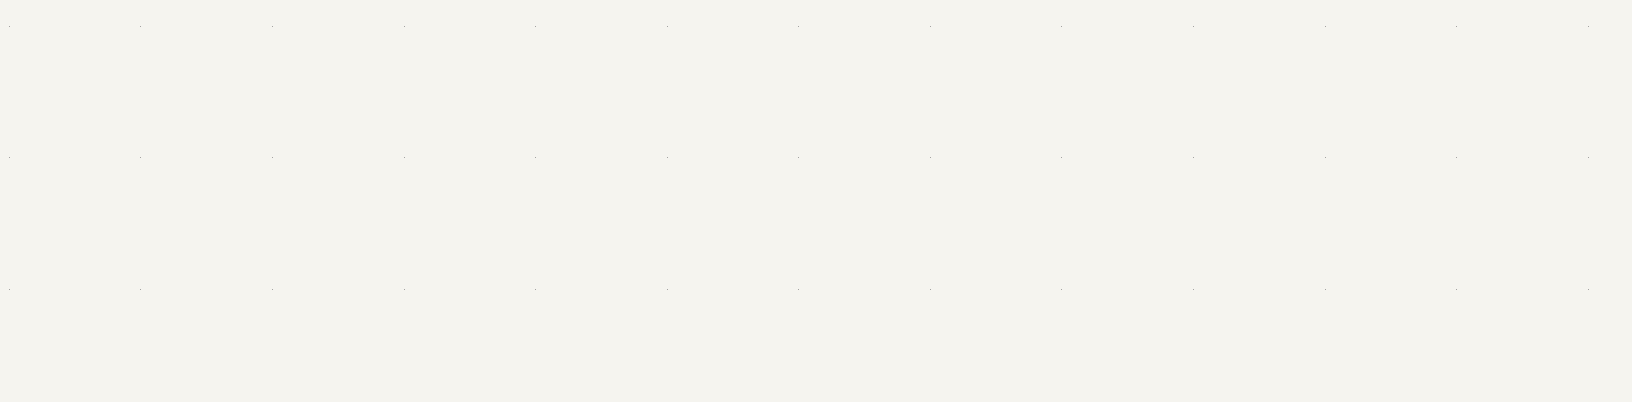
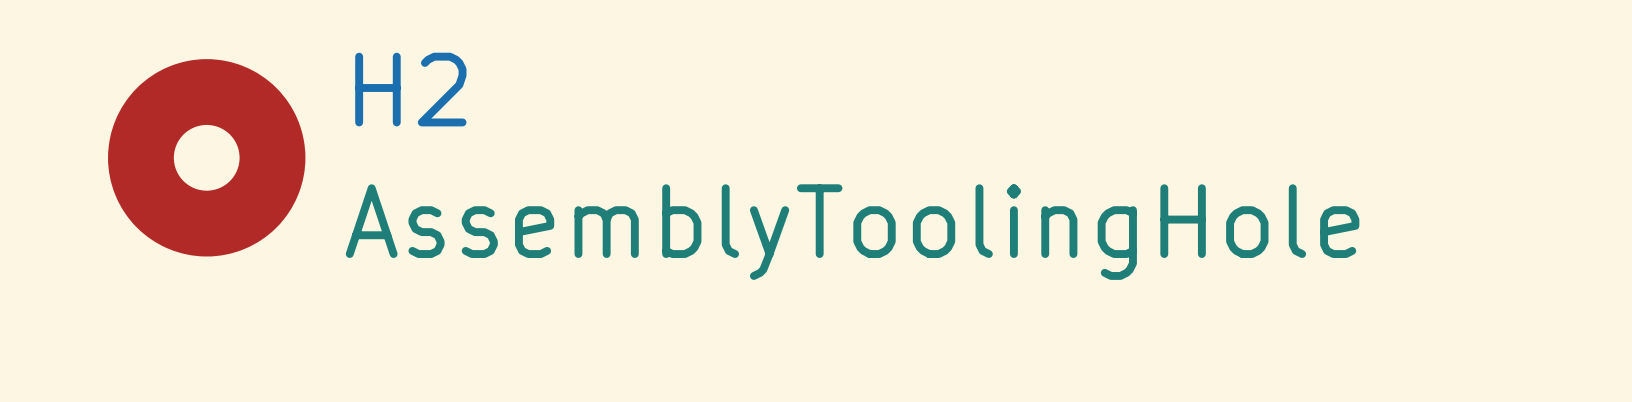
H2: none -> AssemblyToolingHole (206, 157)

